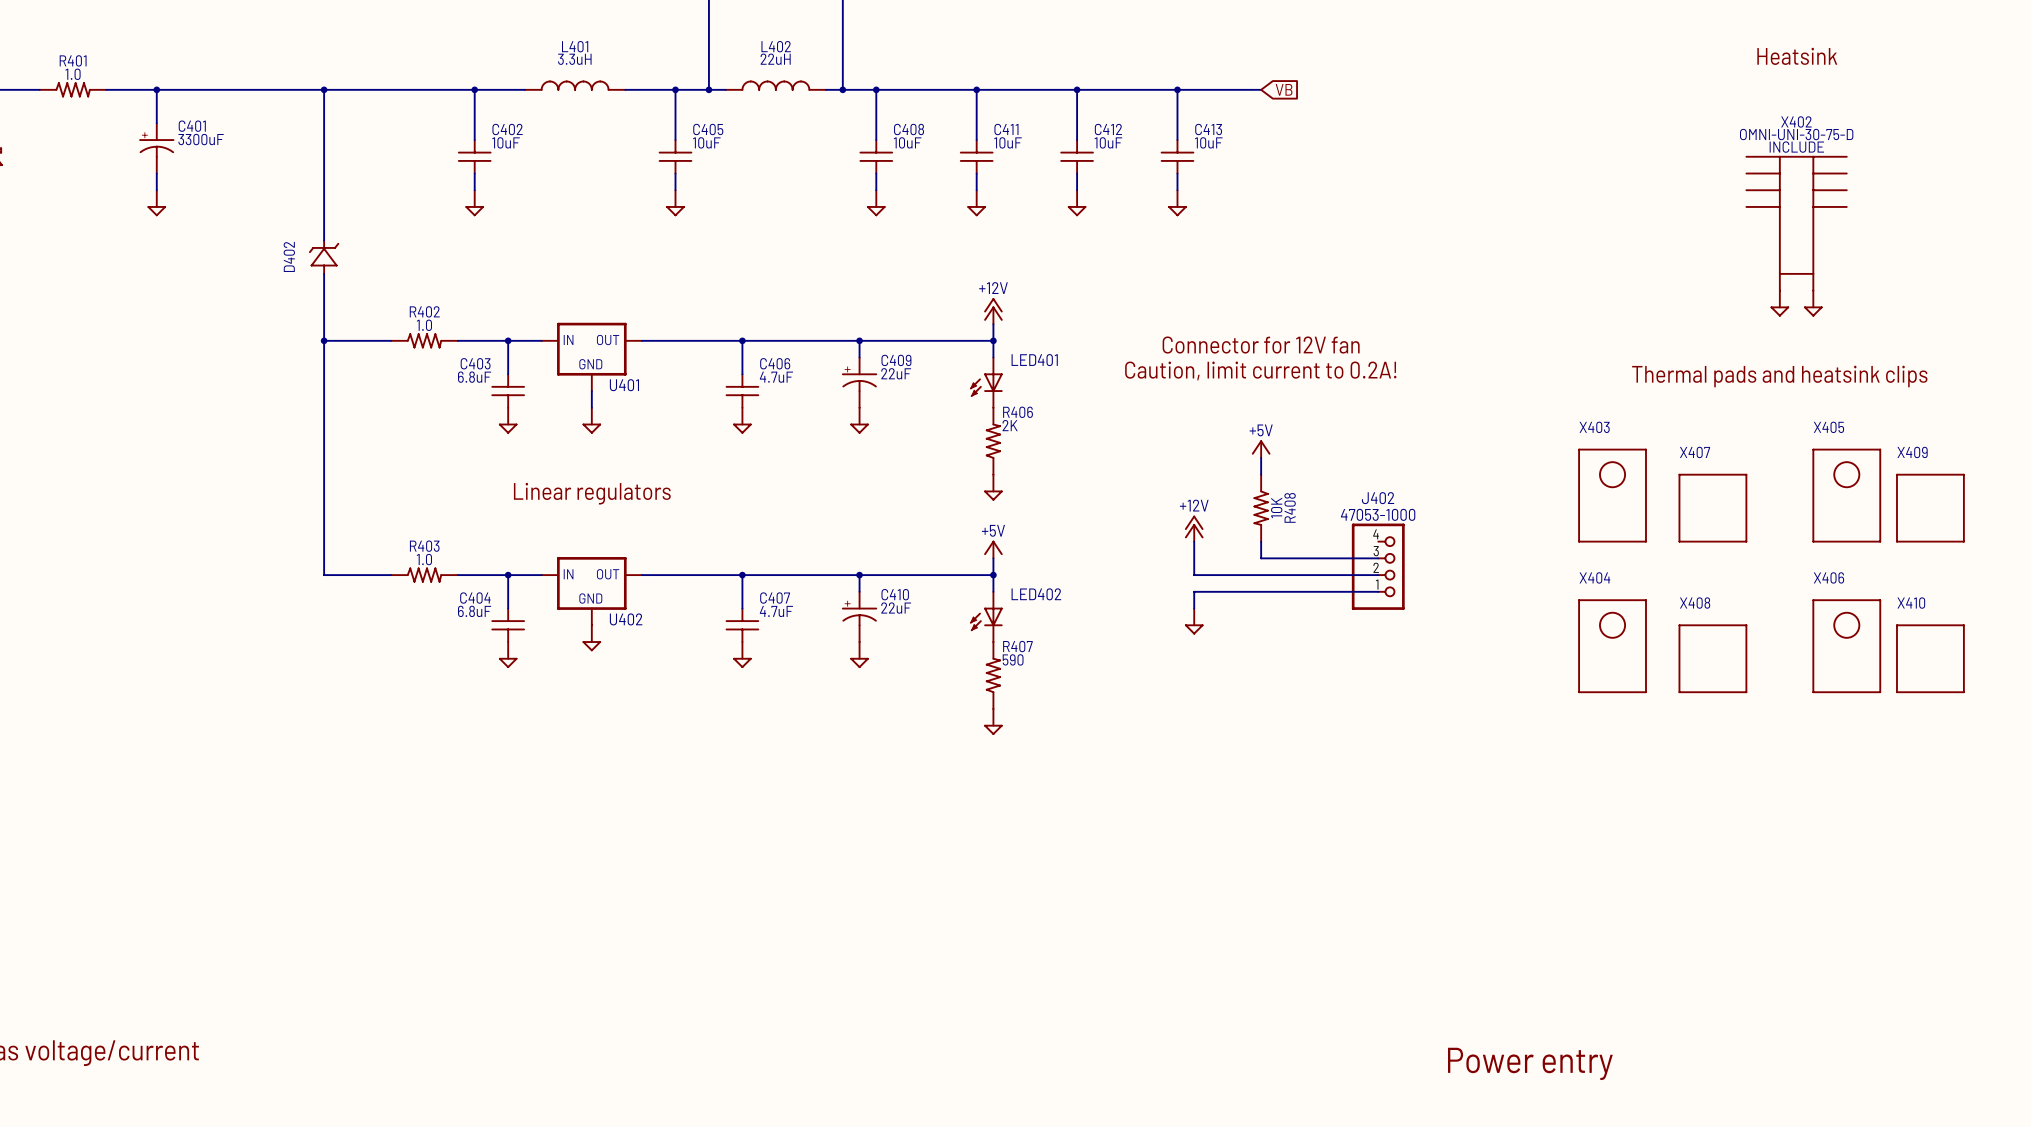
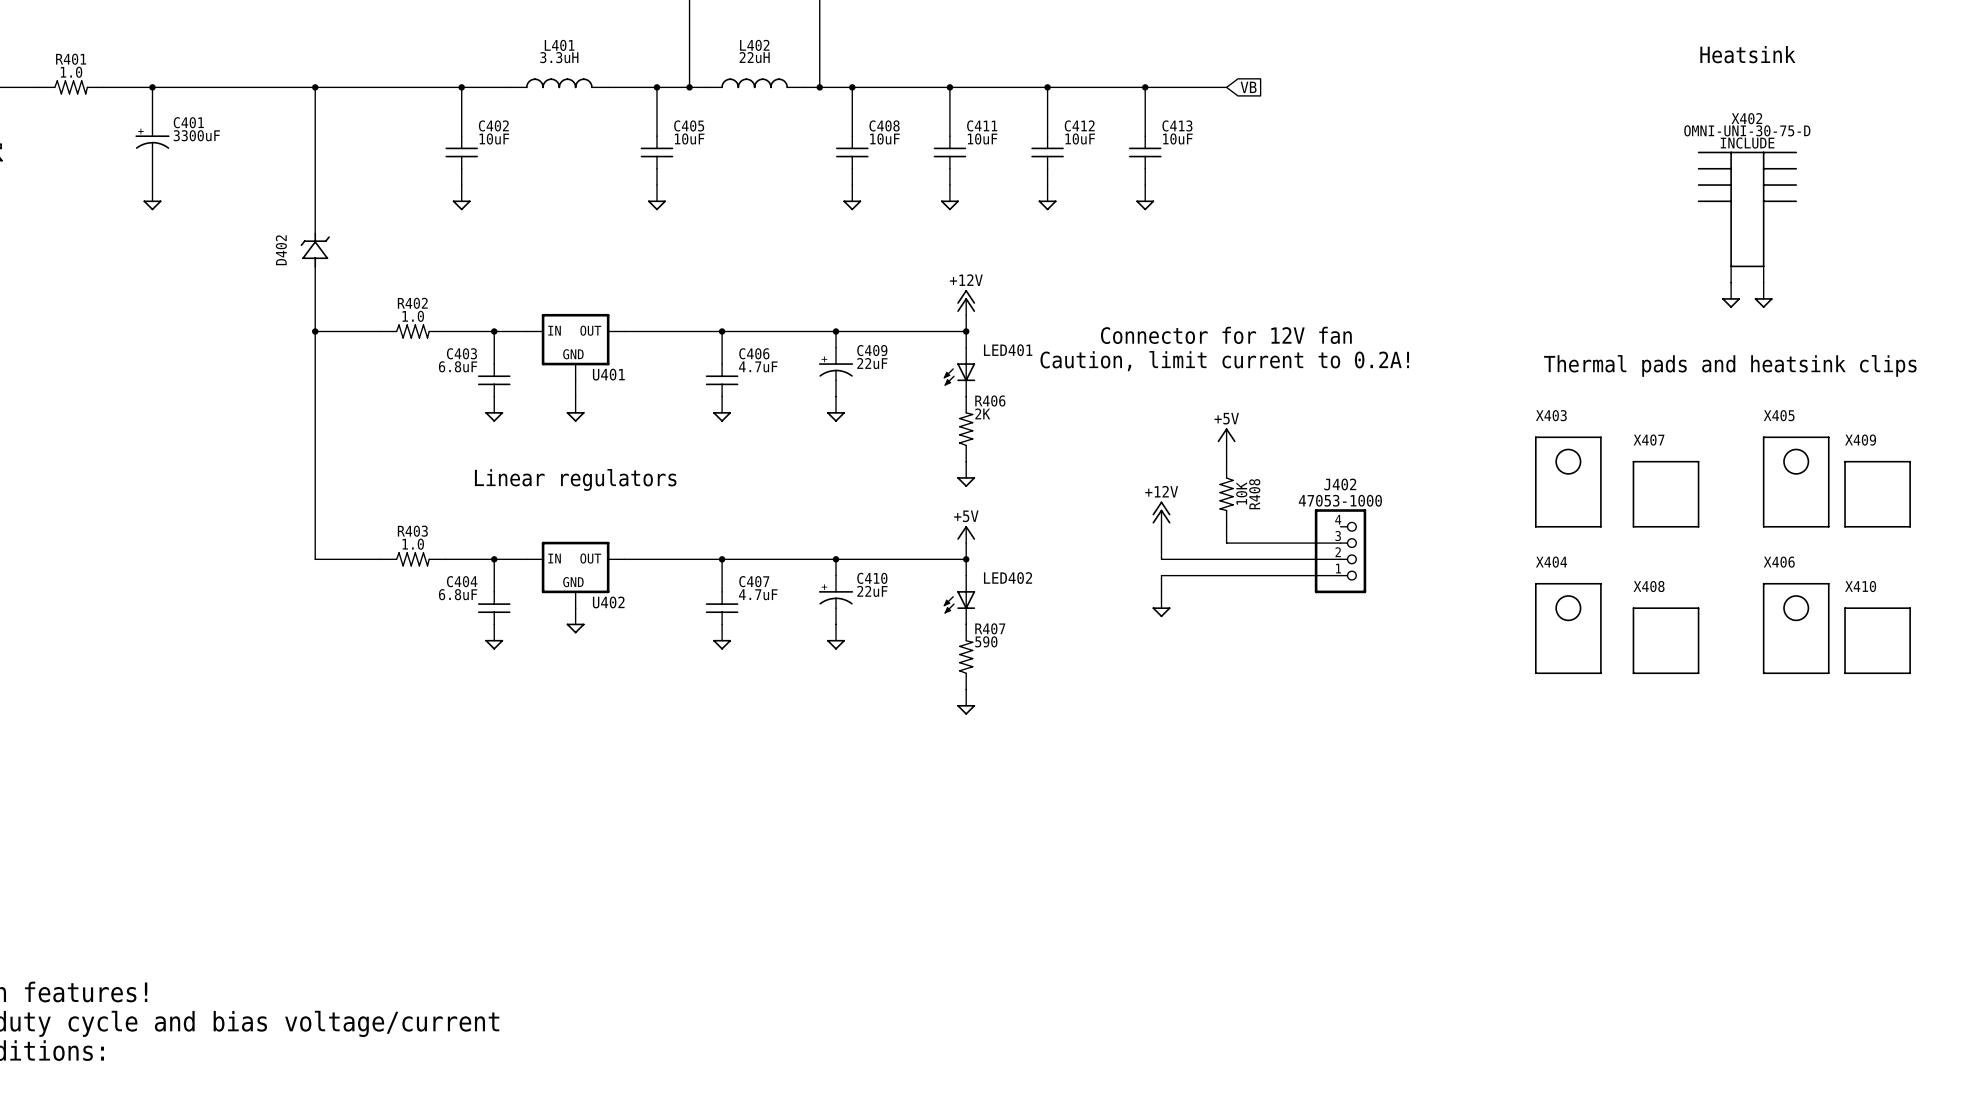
text: Power entry (1530, 1063) -> none

